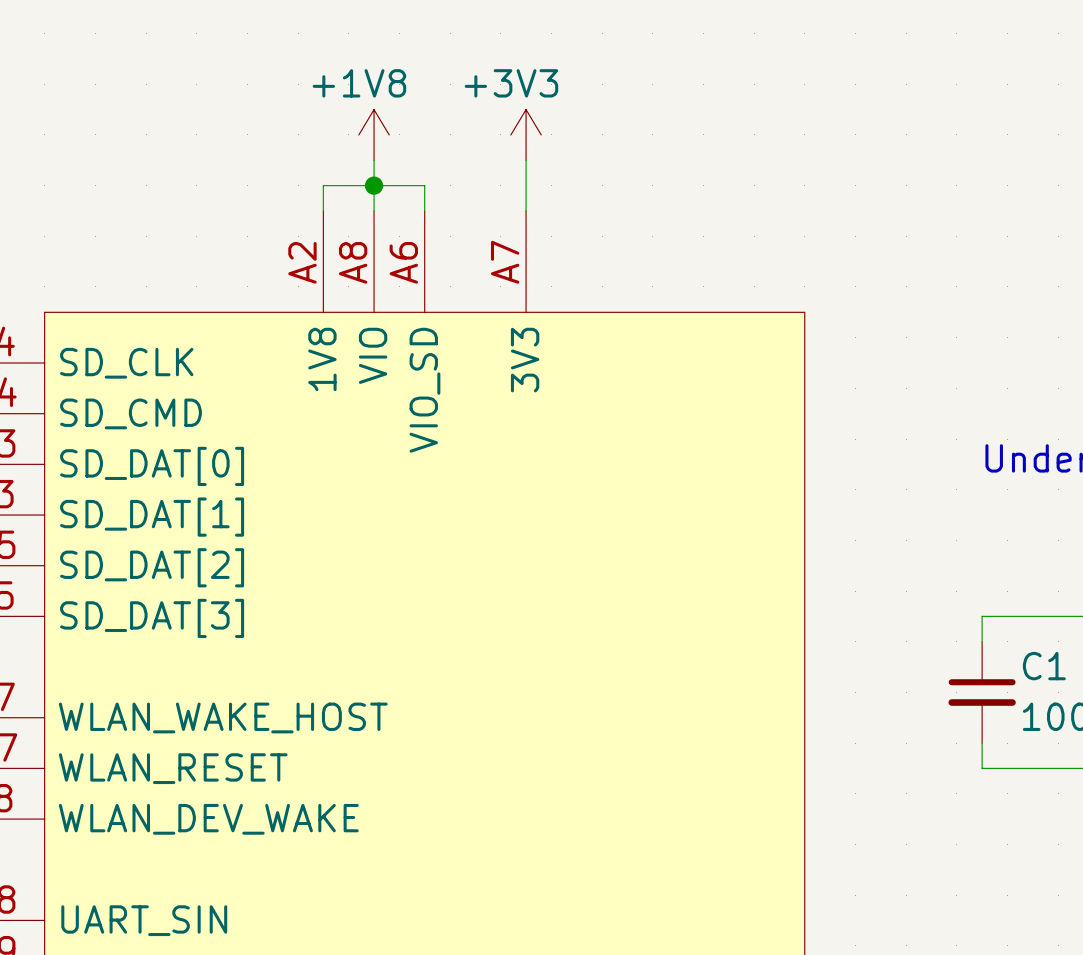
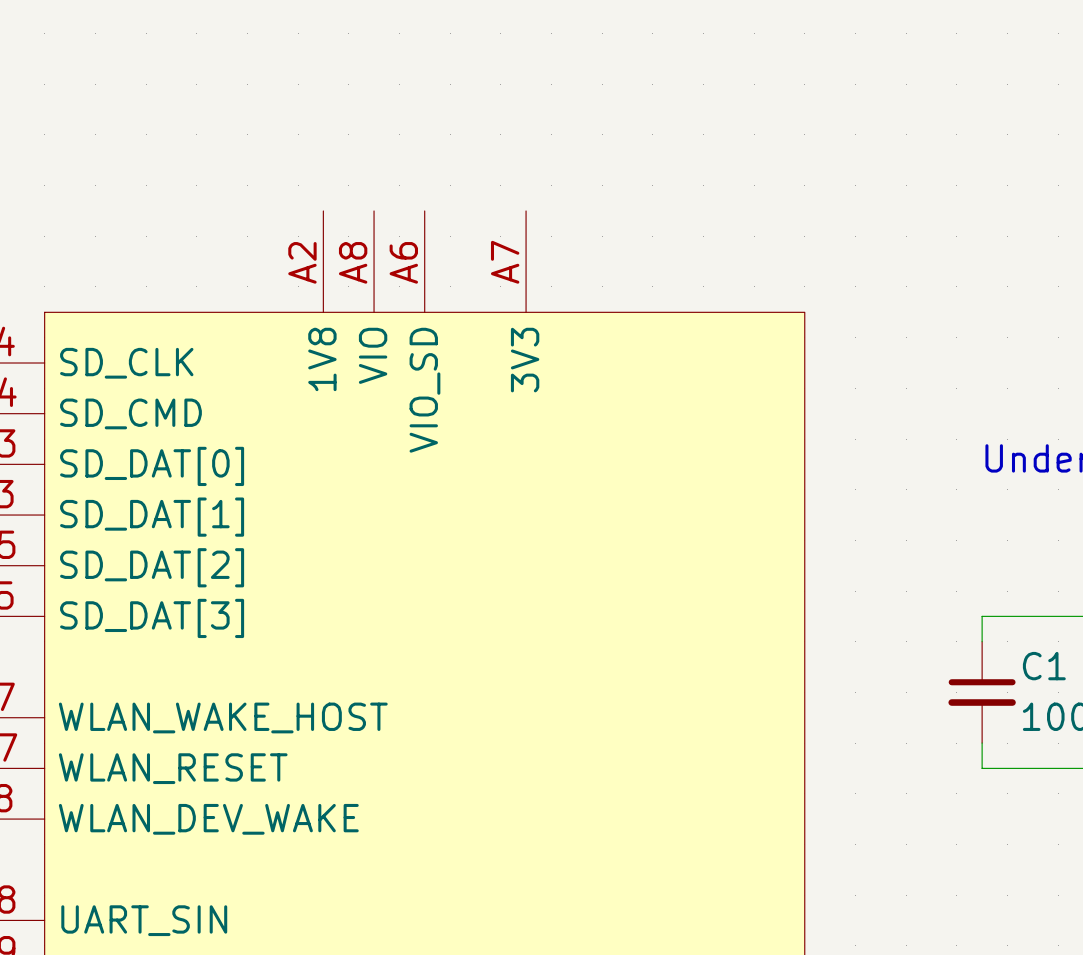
power symbol: +1V8 (374, 134) -> none
power symbol: +3V3 (526, 134) -> none
wire: (374, 160) (374, 210) -> none
wire: (526, 160) (526, 210) -> none
junction: (374, 185) -> none
wire: (323, 210) (323, 185) (424, 185) (424, 210) -> none

